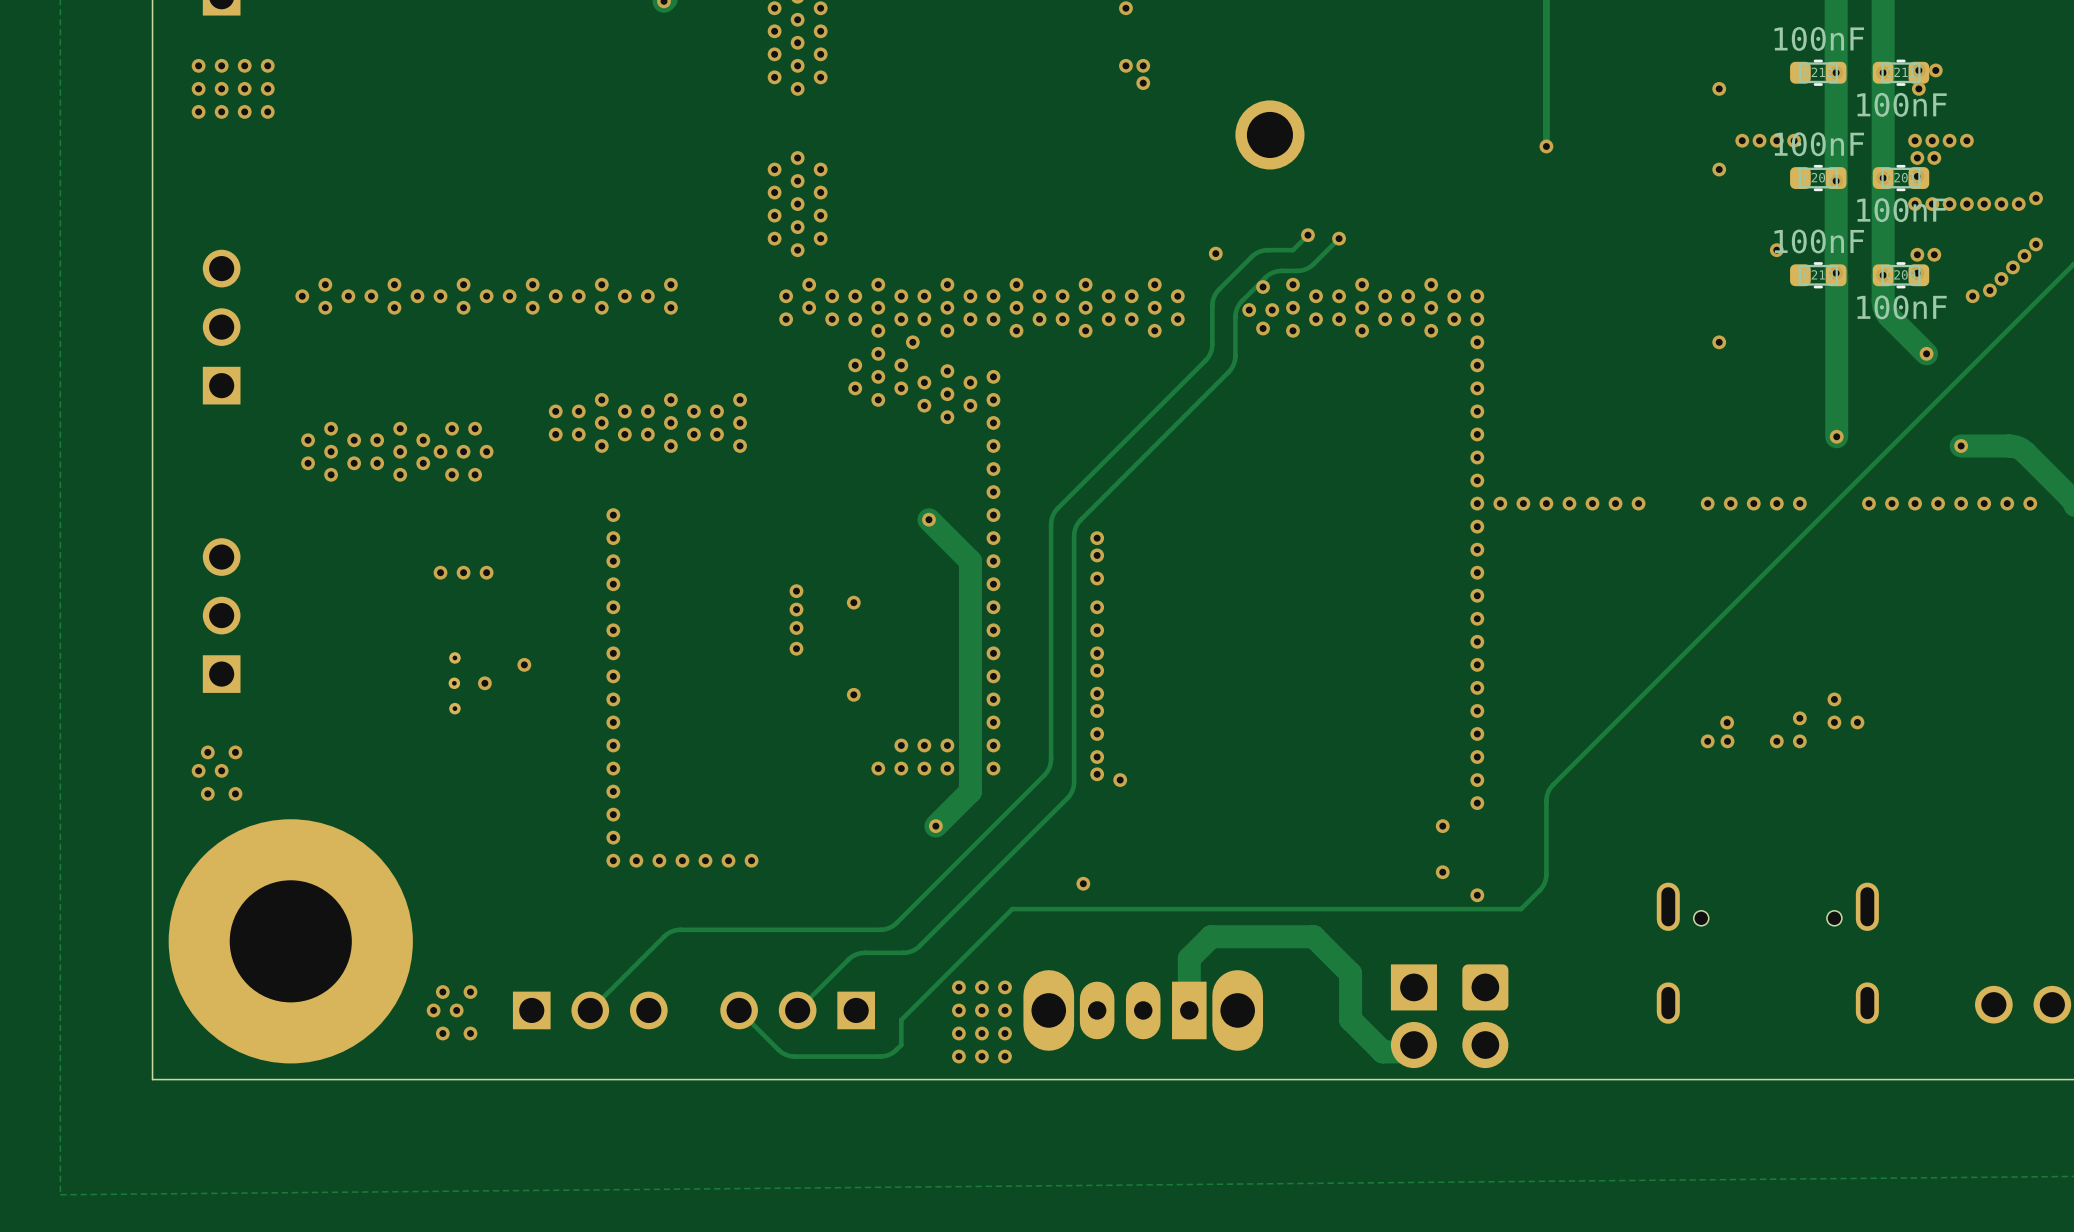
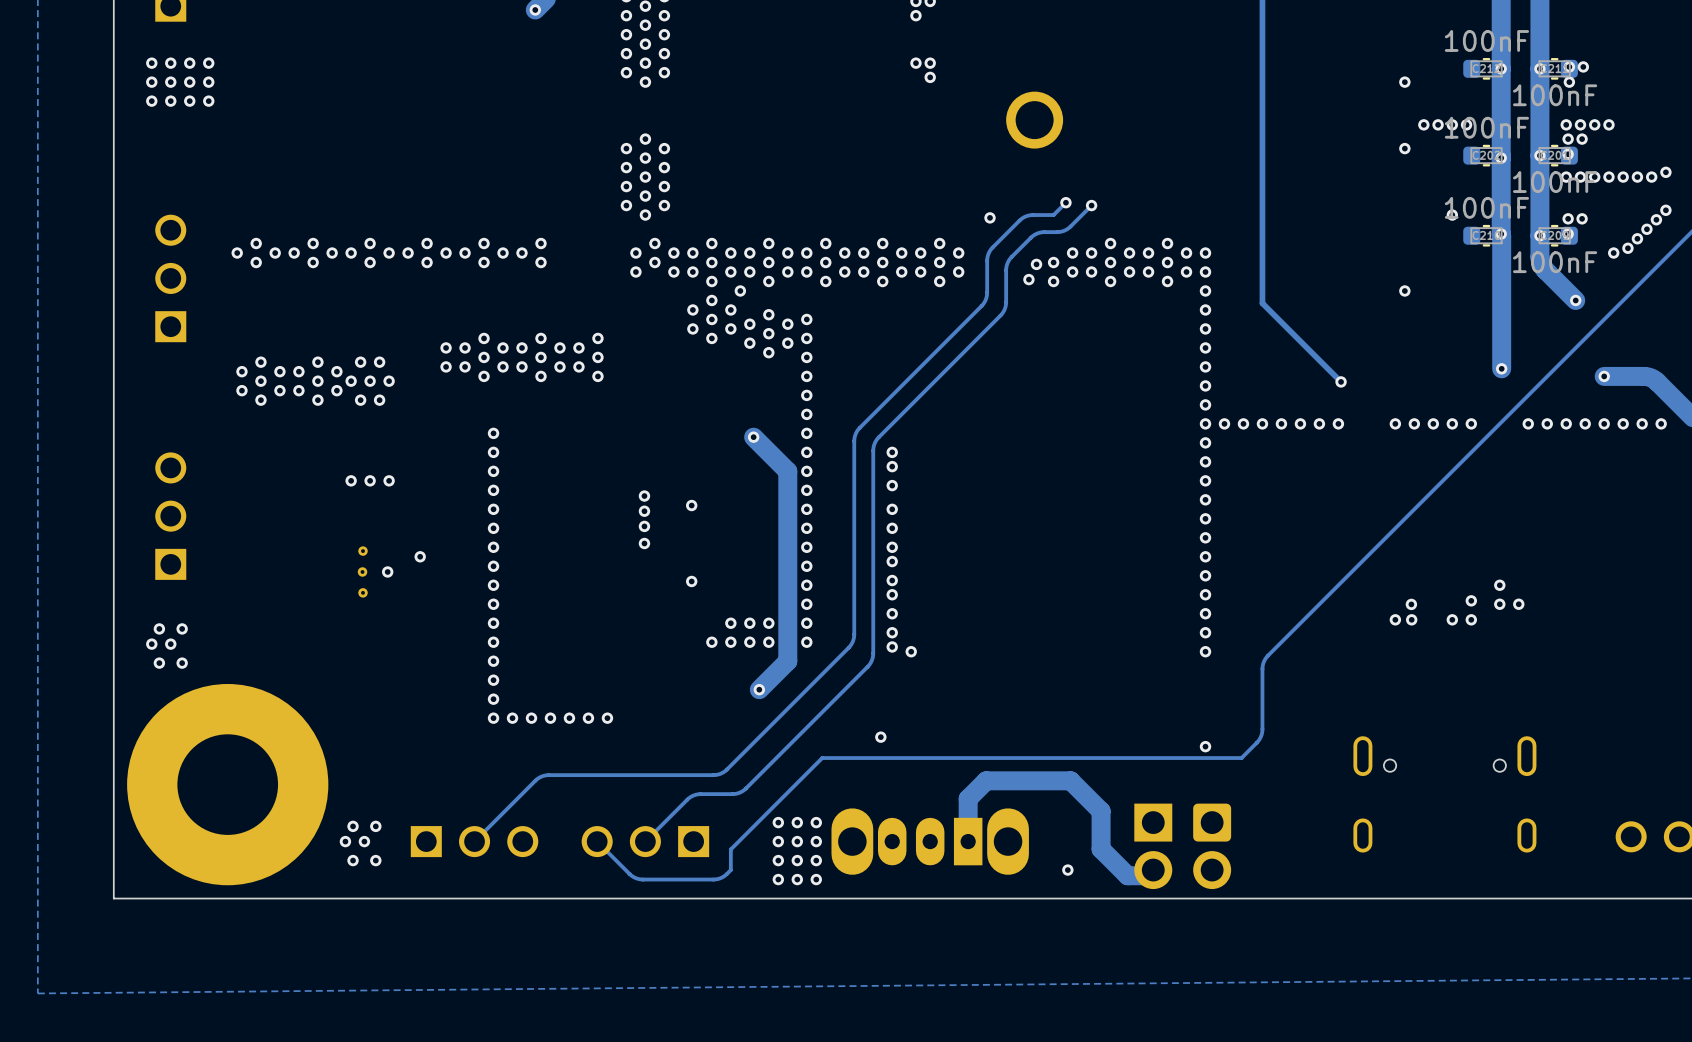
track: none -> (1262, 129) (1262, 303) (1341, 381)
via: (1546, 146) -> none
via: (1292, 284) -> none
via: (1263, 287) -> none
via: (1249, 310) -> none
via: none -> (1341, 381)
via: (1477, 803) -> none
via: (1442, 826) -> none
via: (1442, 872) -> none
via: none -> (1067, 870)

